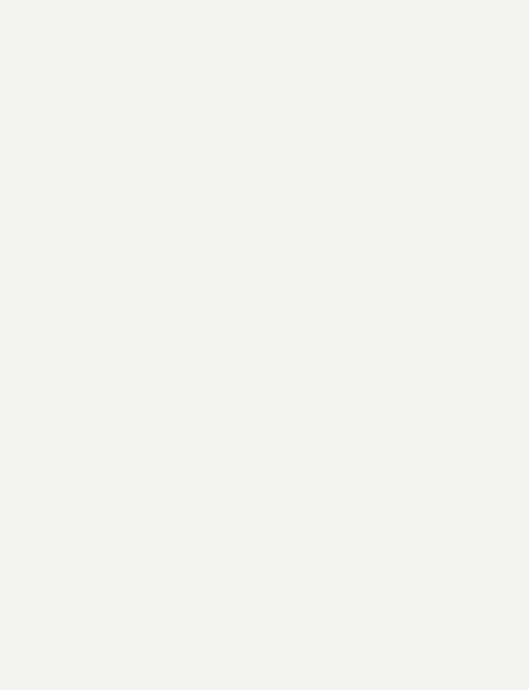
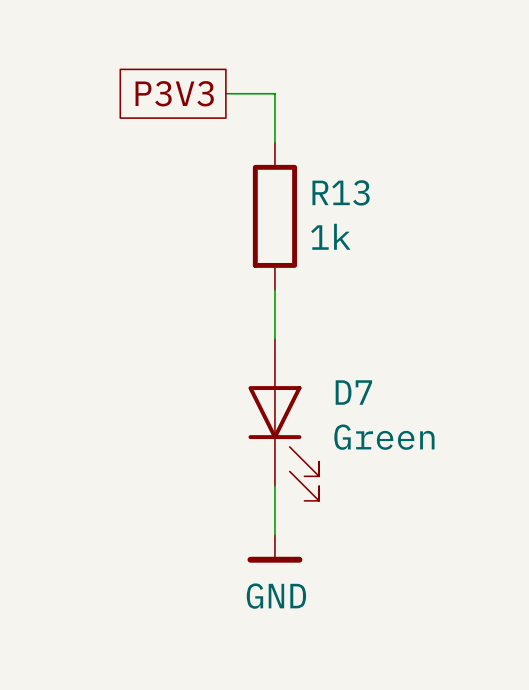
global label: none -> P3V3 (174, 93)
wire: none -> (225, 93) (274, 93) (274, 142)
R13: none -> 1k (274, 216)
wire: none -> (274, 289) (274, 339)
D7: none -> Green (283, 419)
wire: none -> (274, 486) (274, 535)
power symbol: none -> GND (274, 548)

